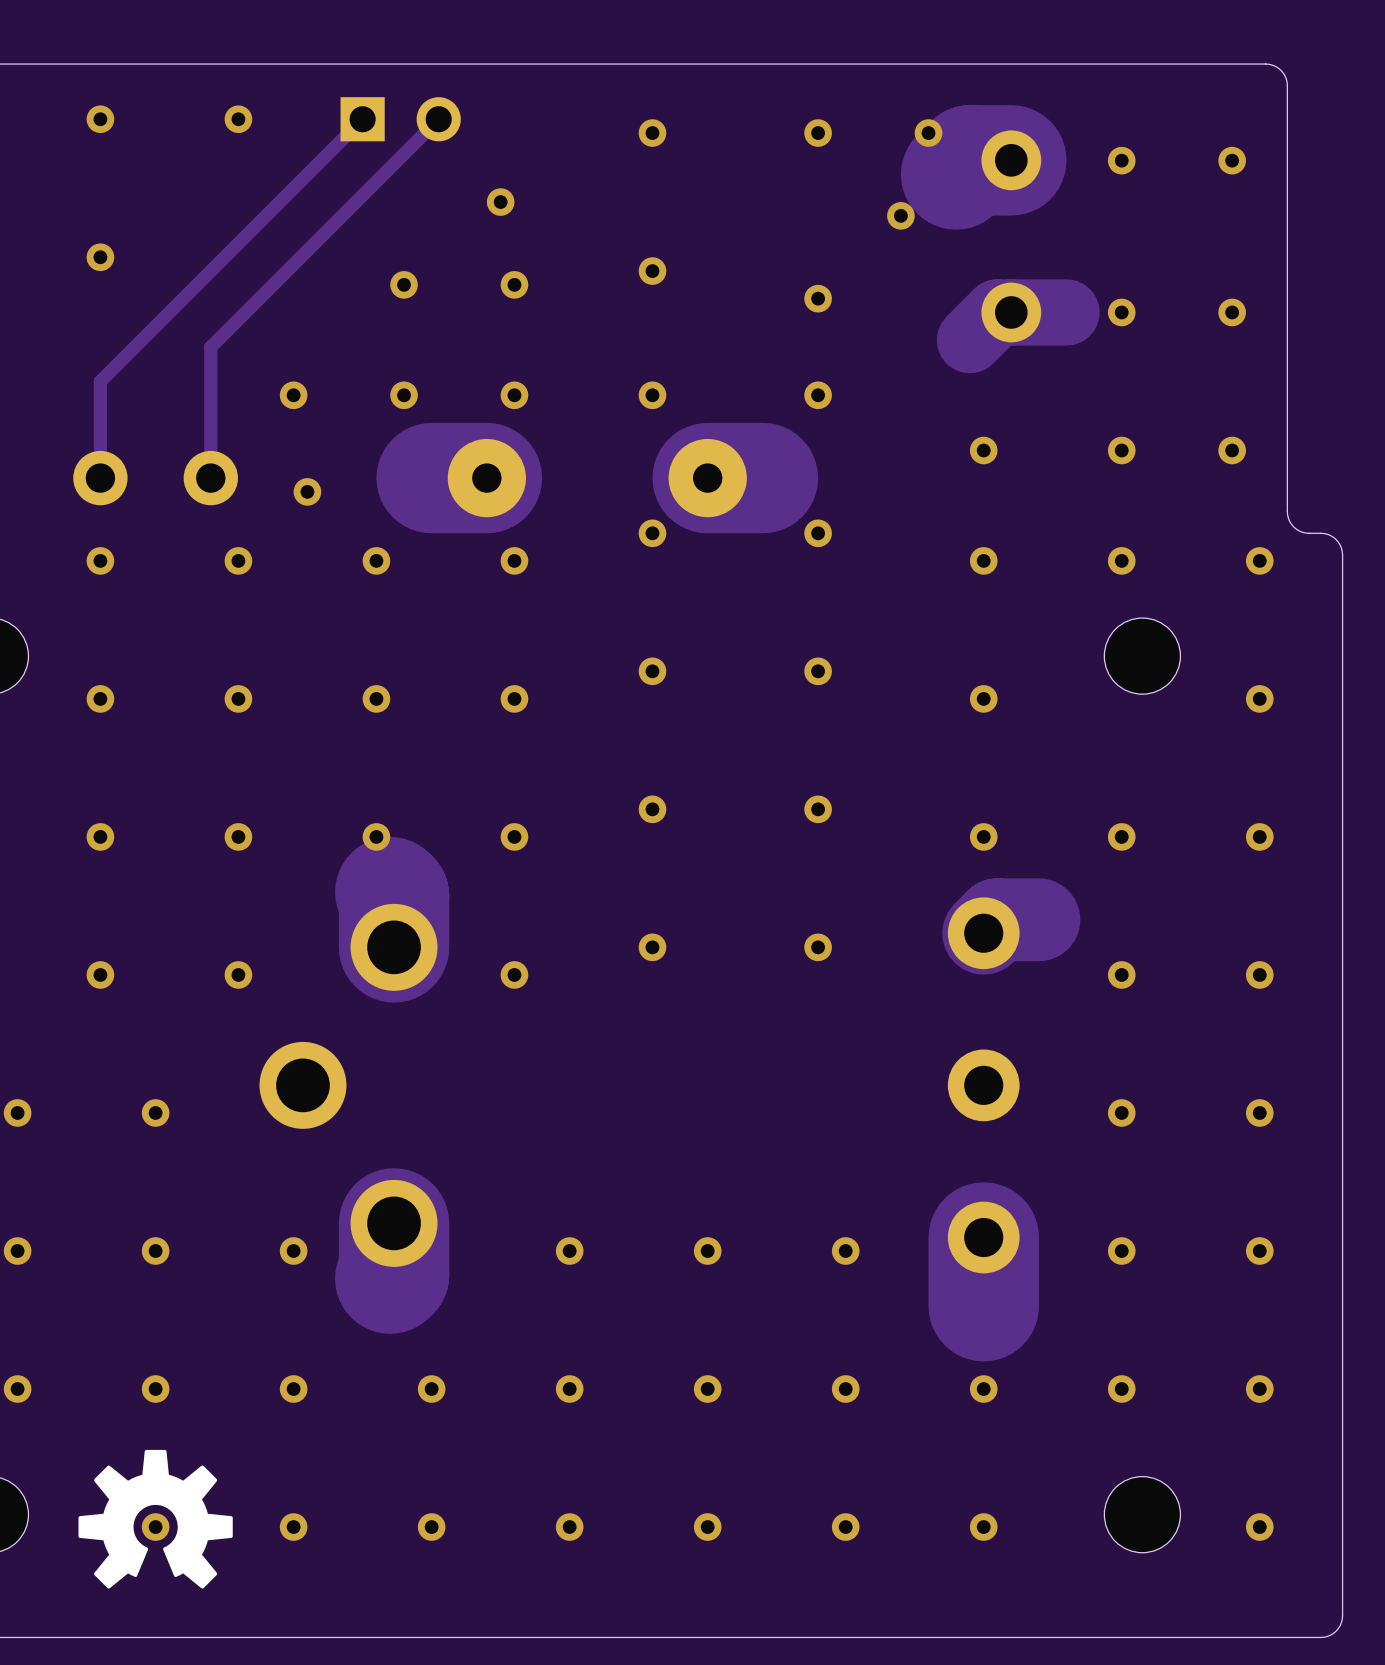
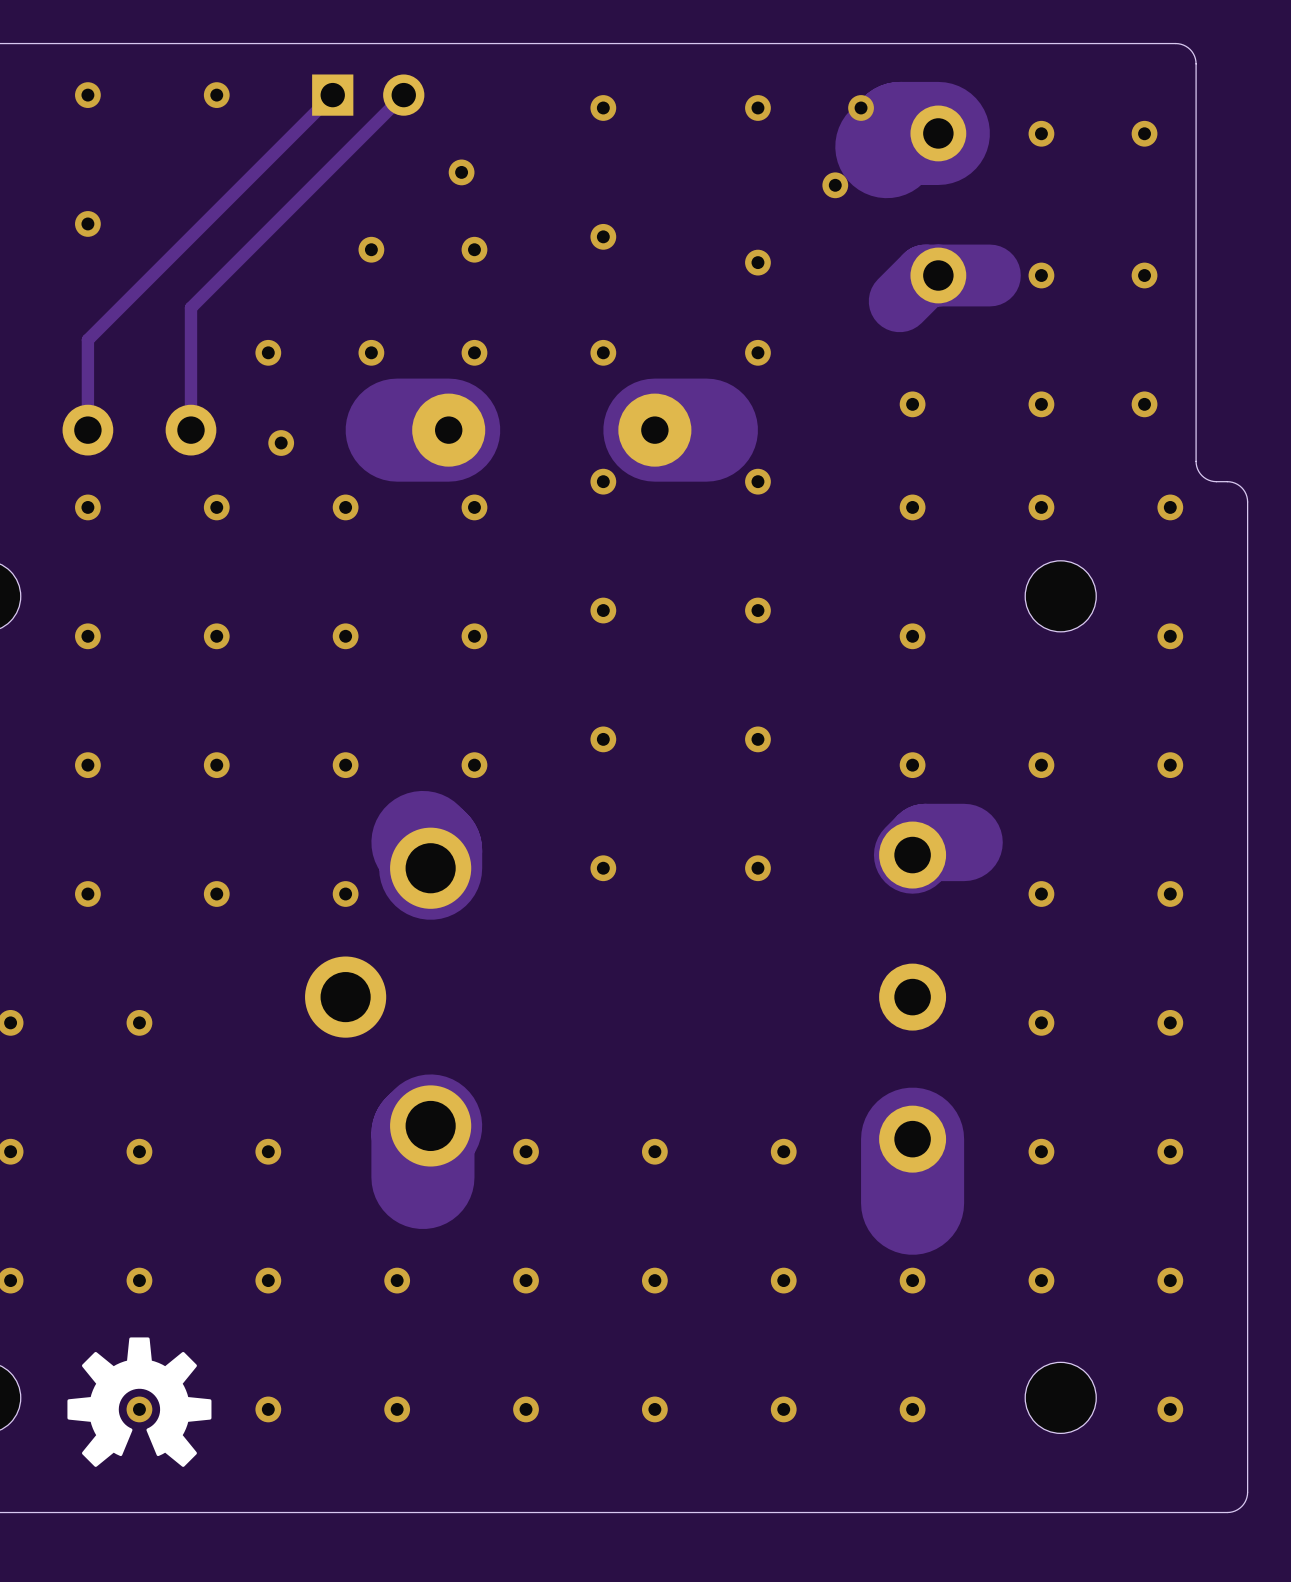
track: (390, 892) (394, 895) (394, 947) -> none
track: none -> (422, 842) (430, 850) (430, 868)
via: none -> (345, 894)
via: (514, 974) -> none
part position: (348, 1085) -> (388, 997)
track: (394, 1223) (394, 1274) (390, 1278) -> none
track: none -> (430, 1125) (422, 1133) (422, 1177)

